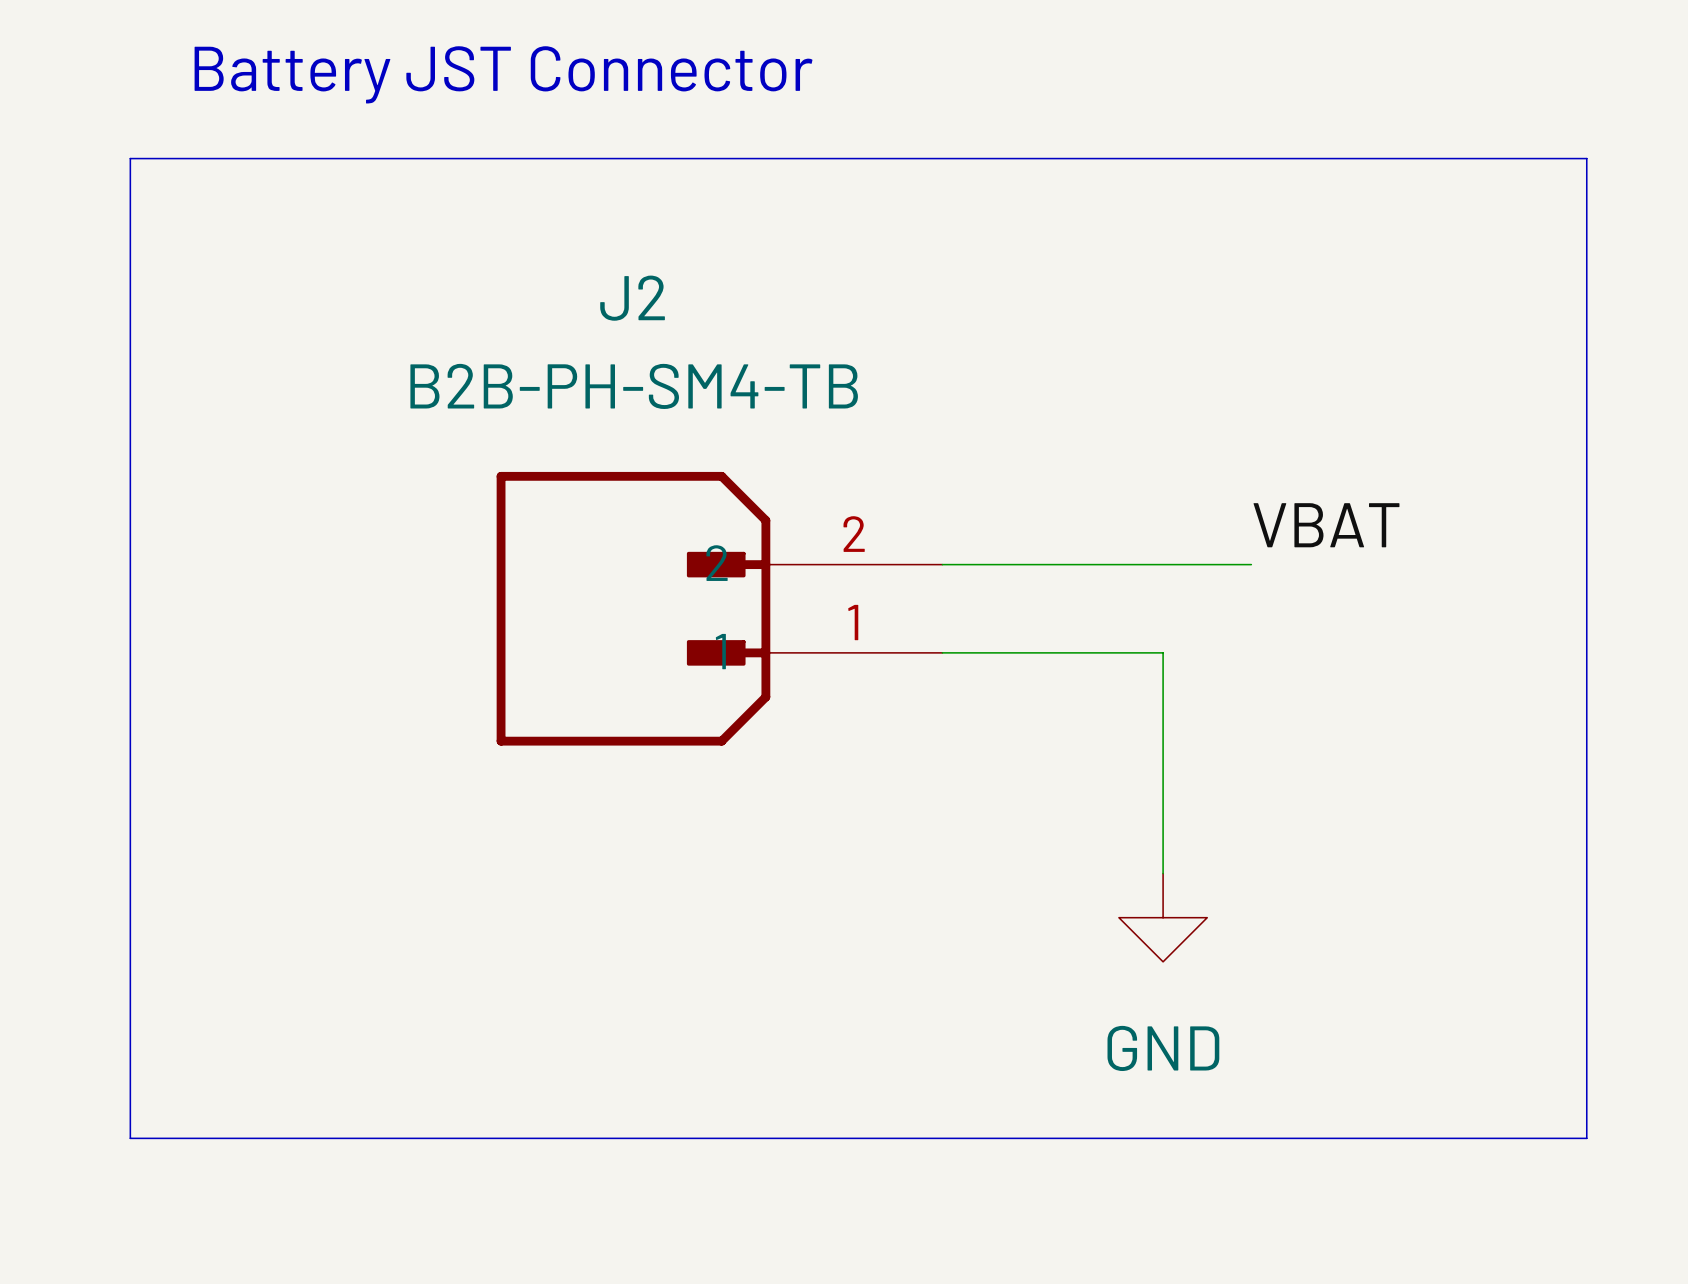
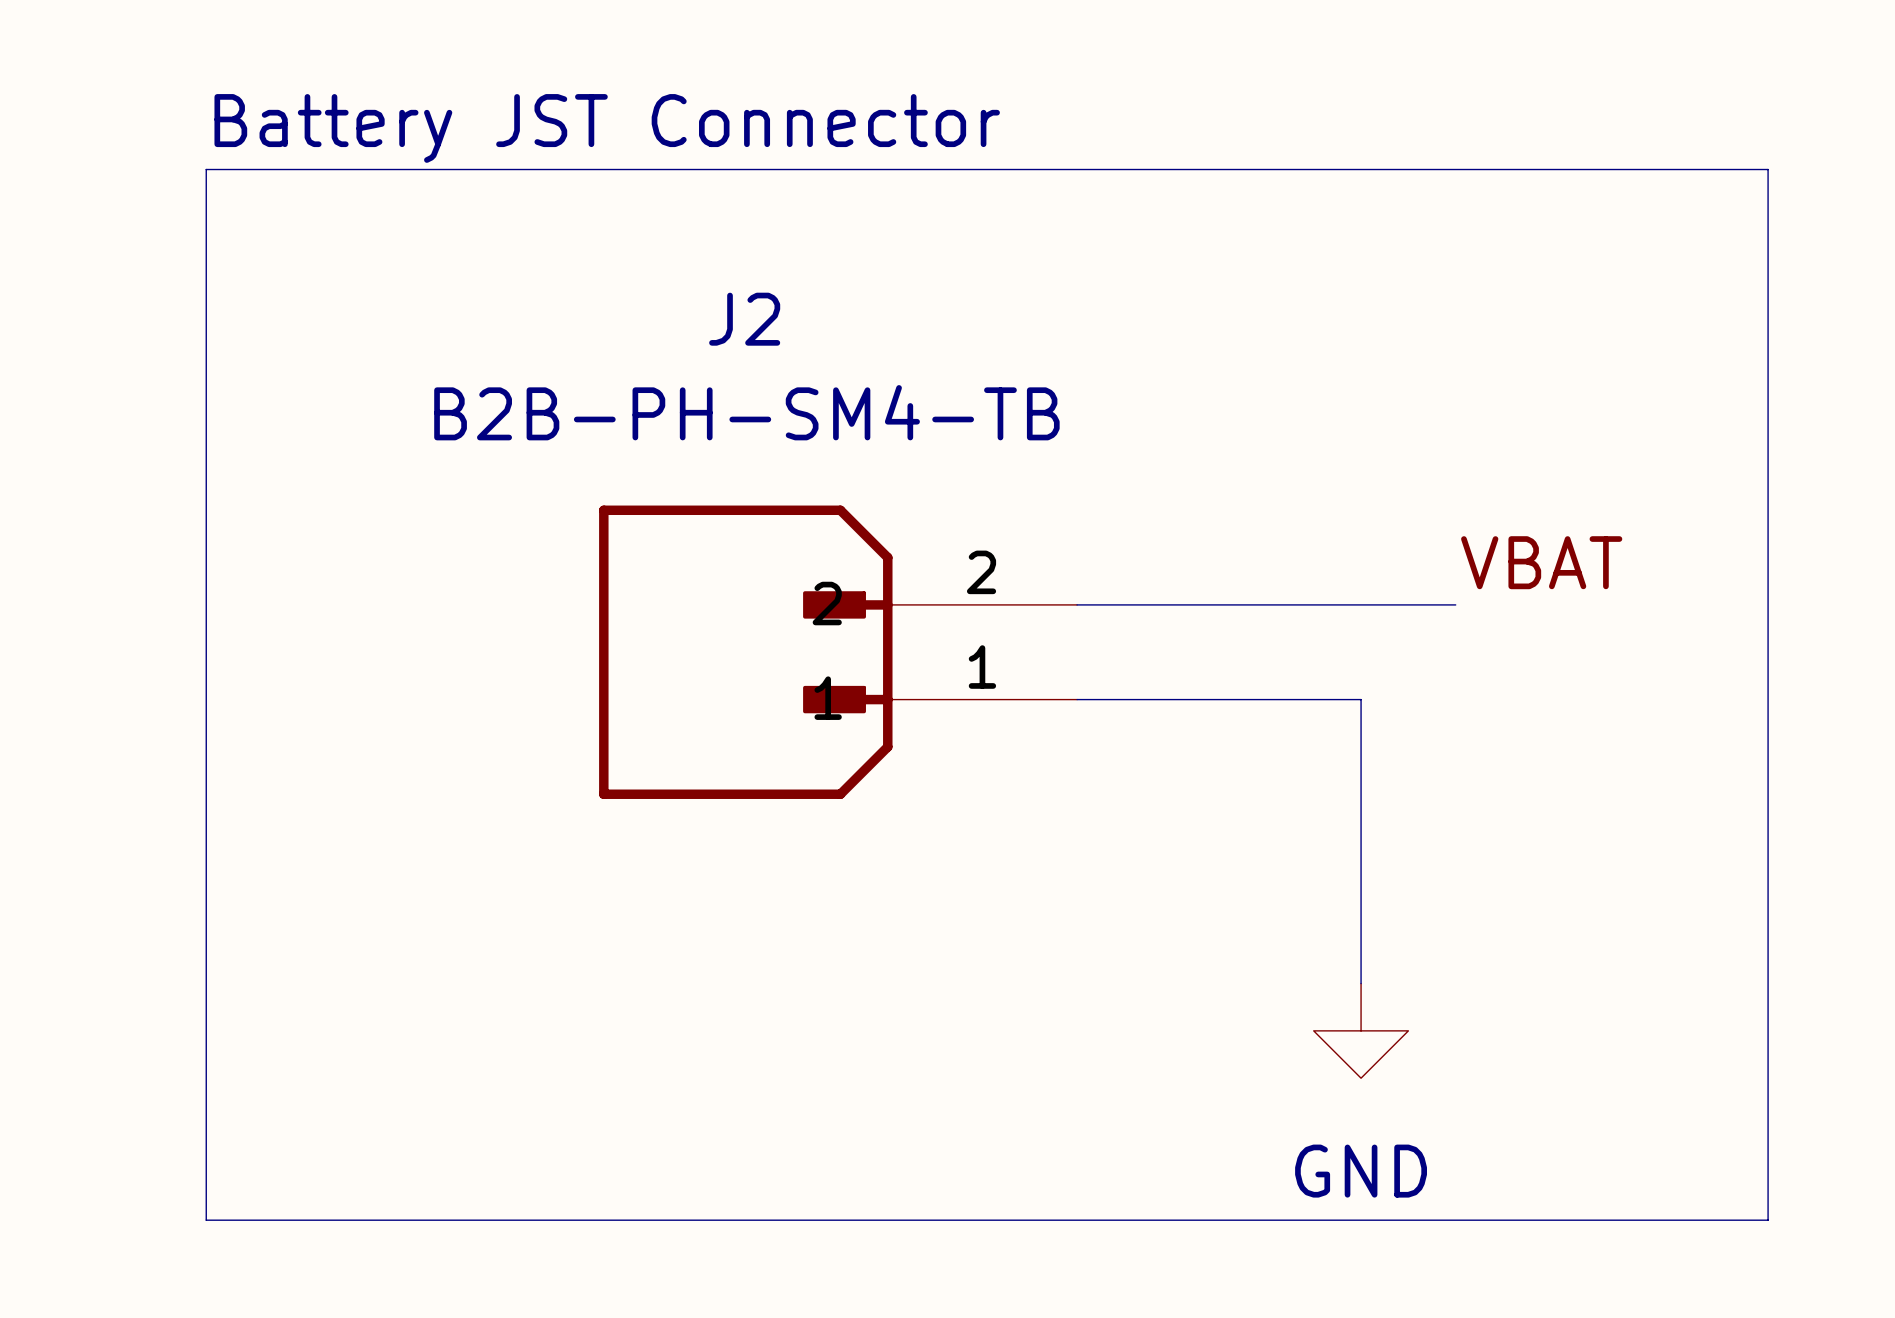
text position: Battery JST Connector (503, 74) -> Battery JST Connector (607, 128)
label position: VBAT (1326, 525) -> VBAT (1541, 562)
wire: none -> (1408, 604) (1455, 604)
wire: (1163, 652) (1163, 873) -> (1313, 699) (1361, 699) (1361, 983)
power symbol position: GND (1163, 917) -> GND (1361, 1030)

